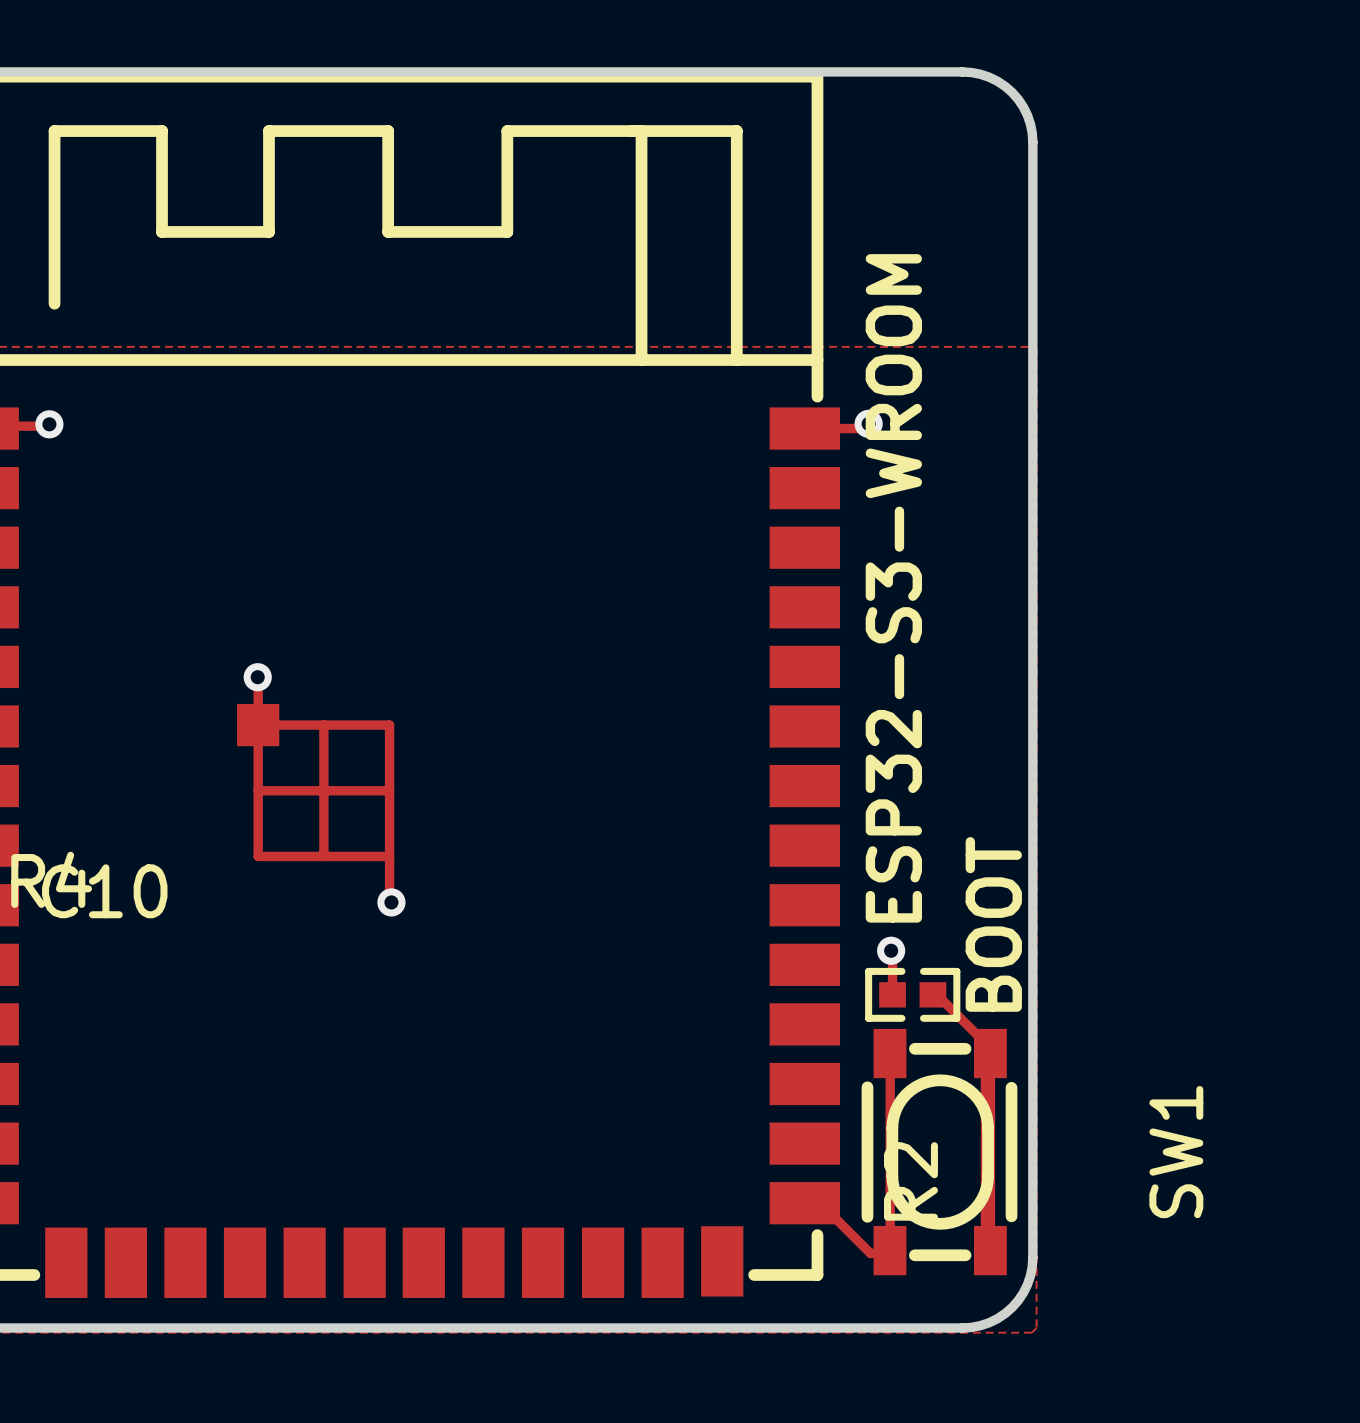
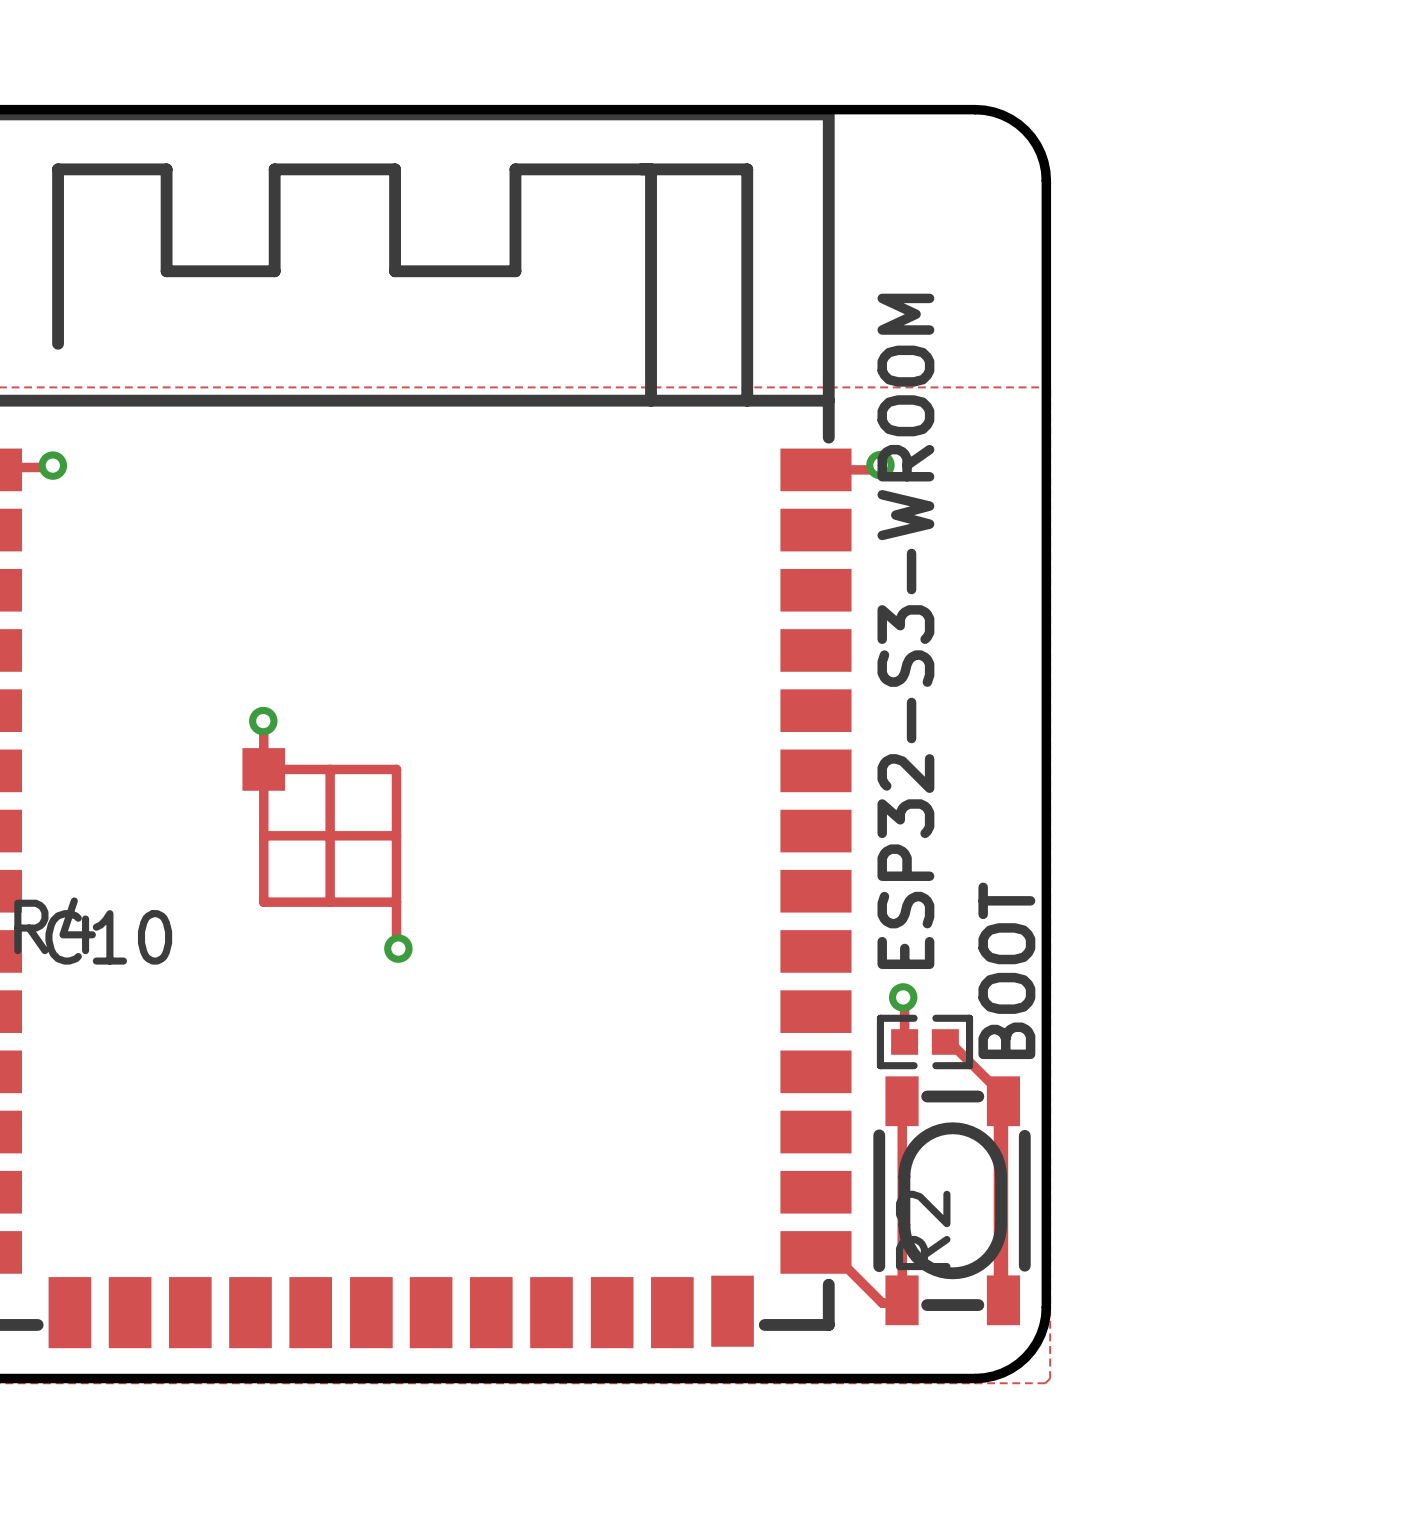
SW1 name: SW1 (1176, 1152) -> none

